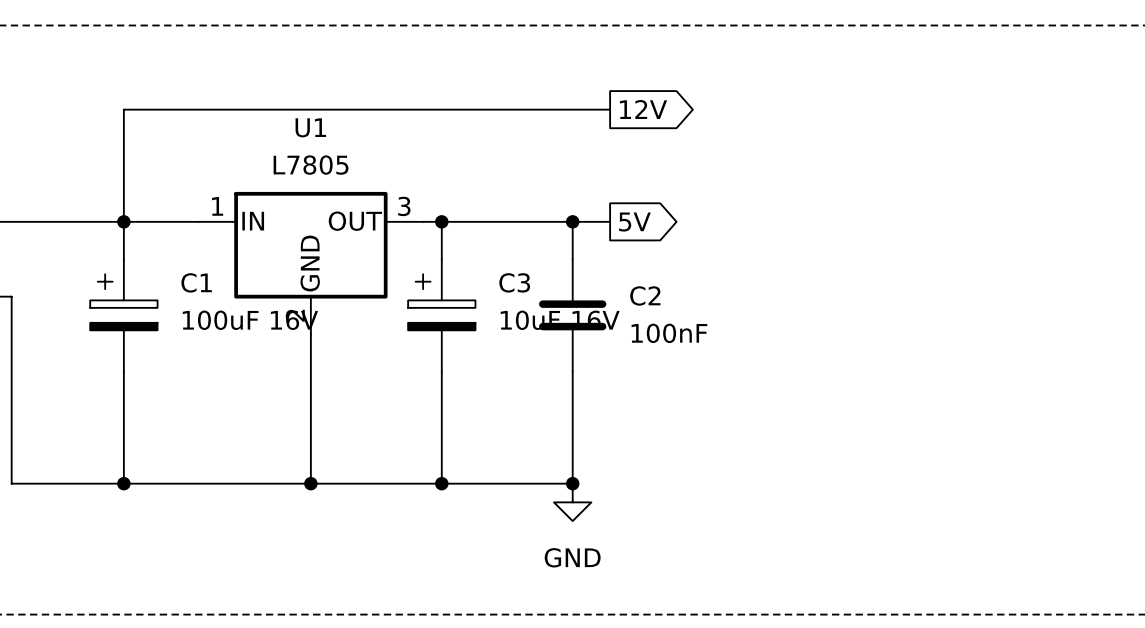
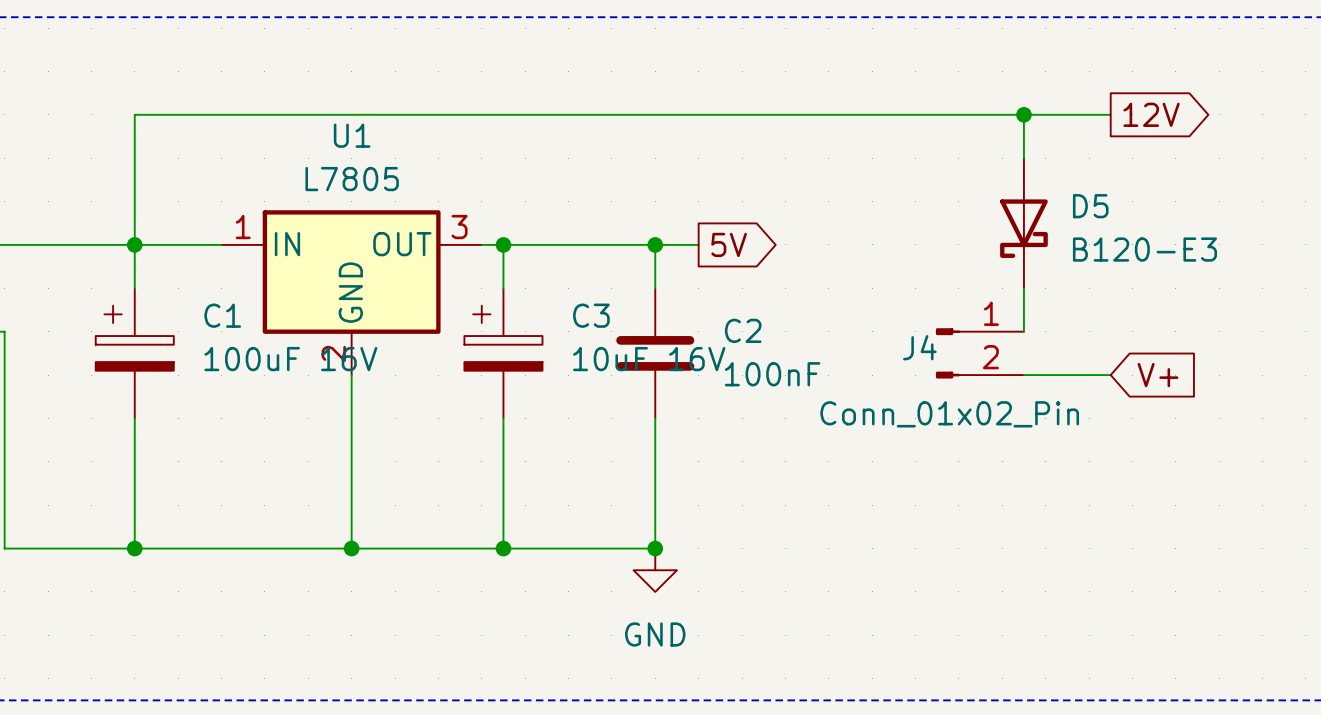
wire: none -> (698, 114) (1110, 114)
global label position: 12V (643, 109) -> 12V (1151, 114)
wire: none -> (1023, 114) (1023, 158)
junction: none -> (1023, 114)
D5: none -> B120-E3 (1023, 223)
wire: none -> (1023, 288) (1023, 331)
J4: none -> Conn_01x02_Pin (979, 353)
wire: none -> (1023, 375) (1110, 375)
global label: none -> V+ (1157, 375)

